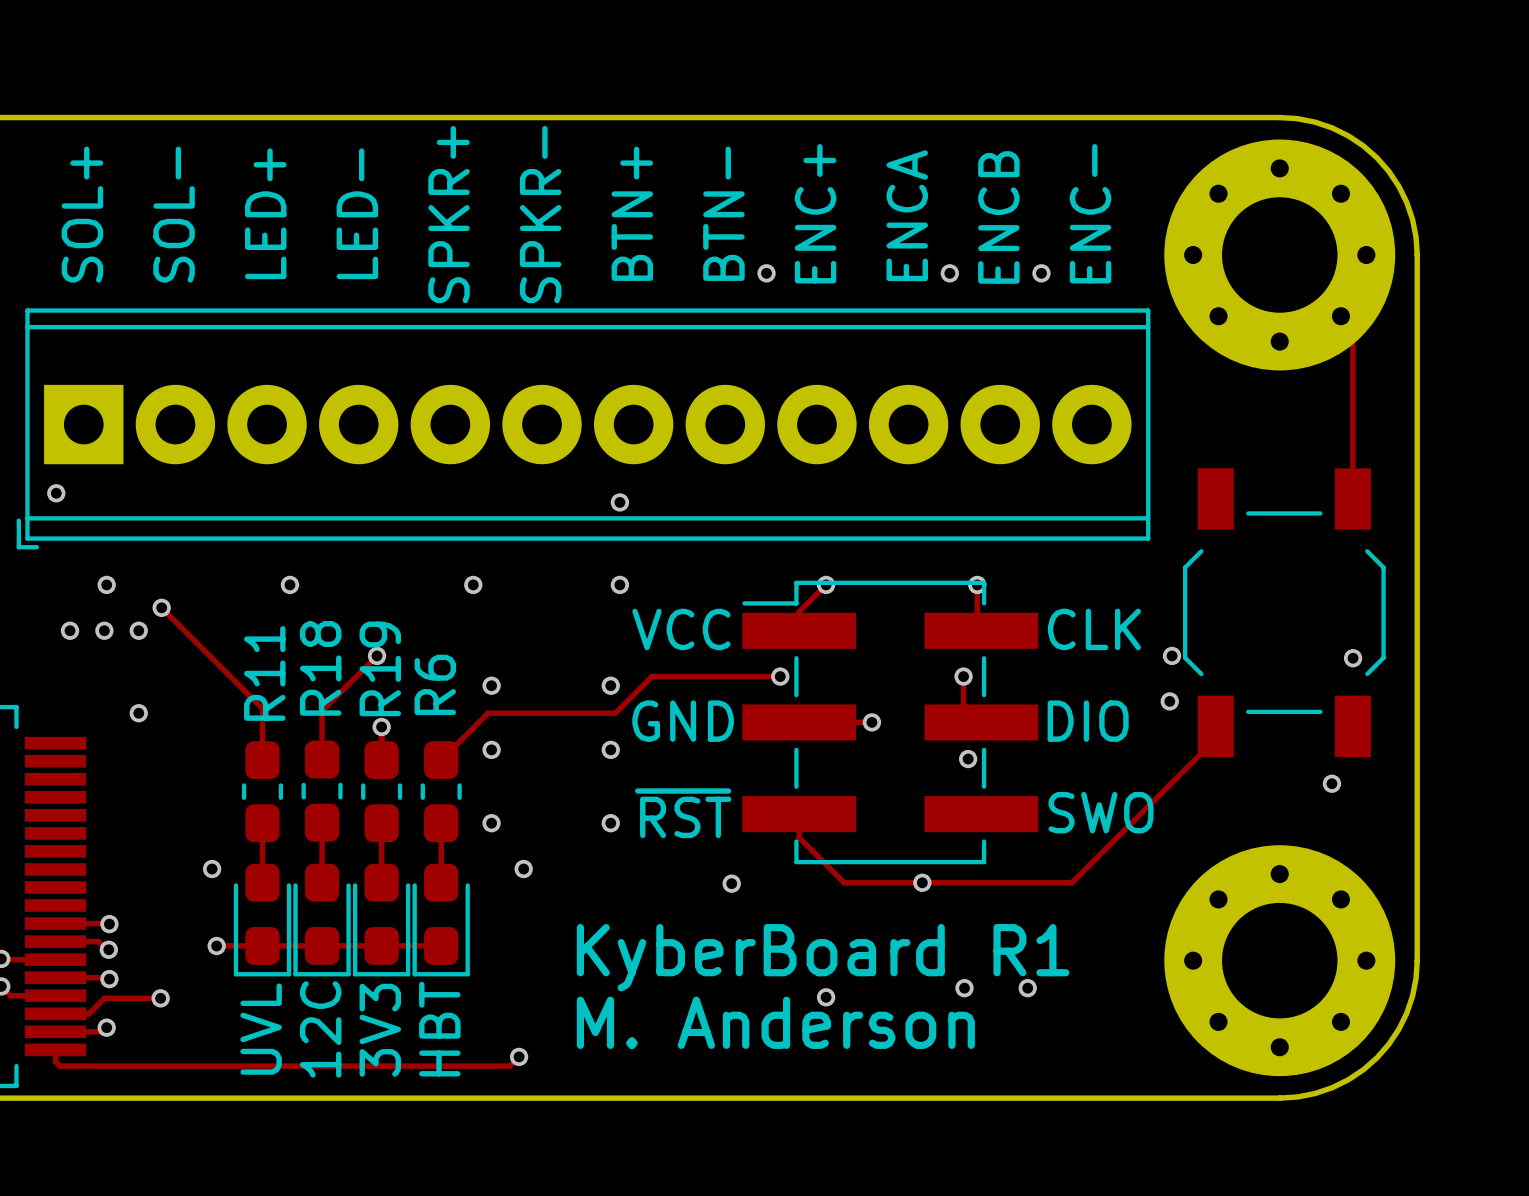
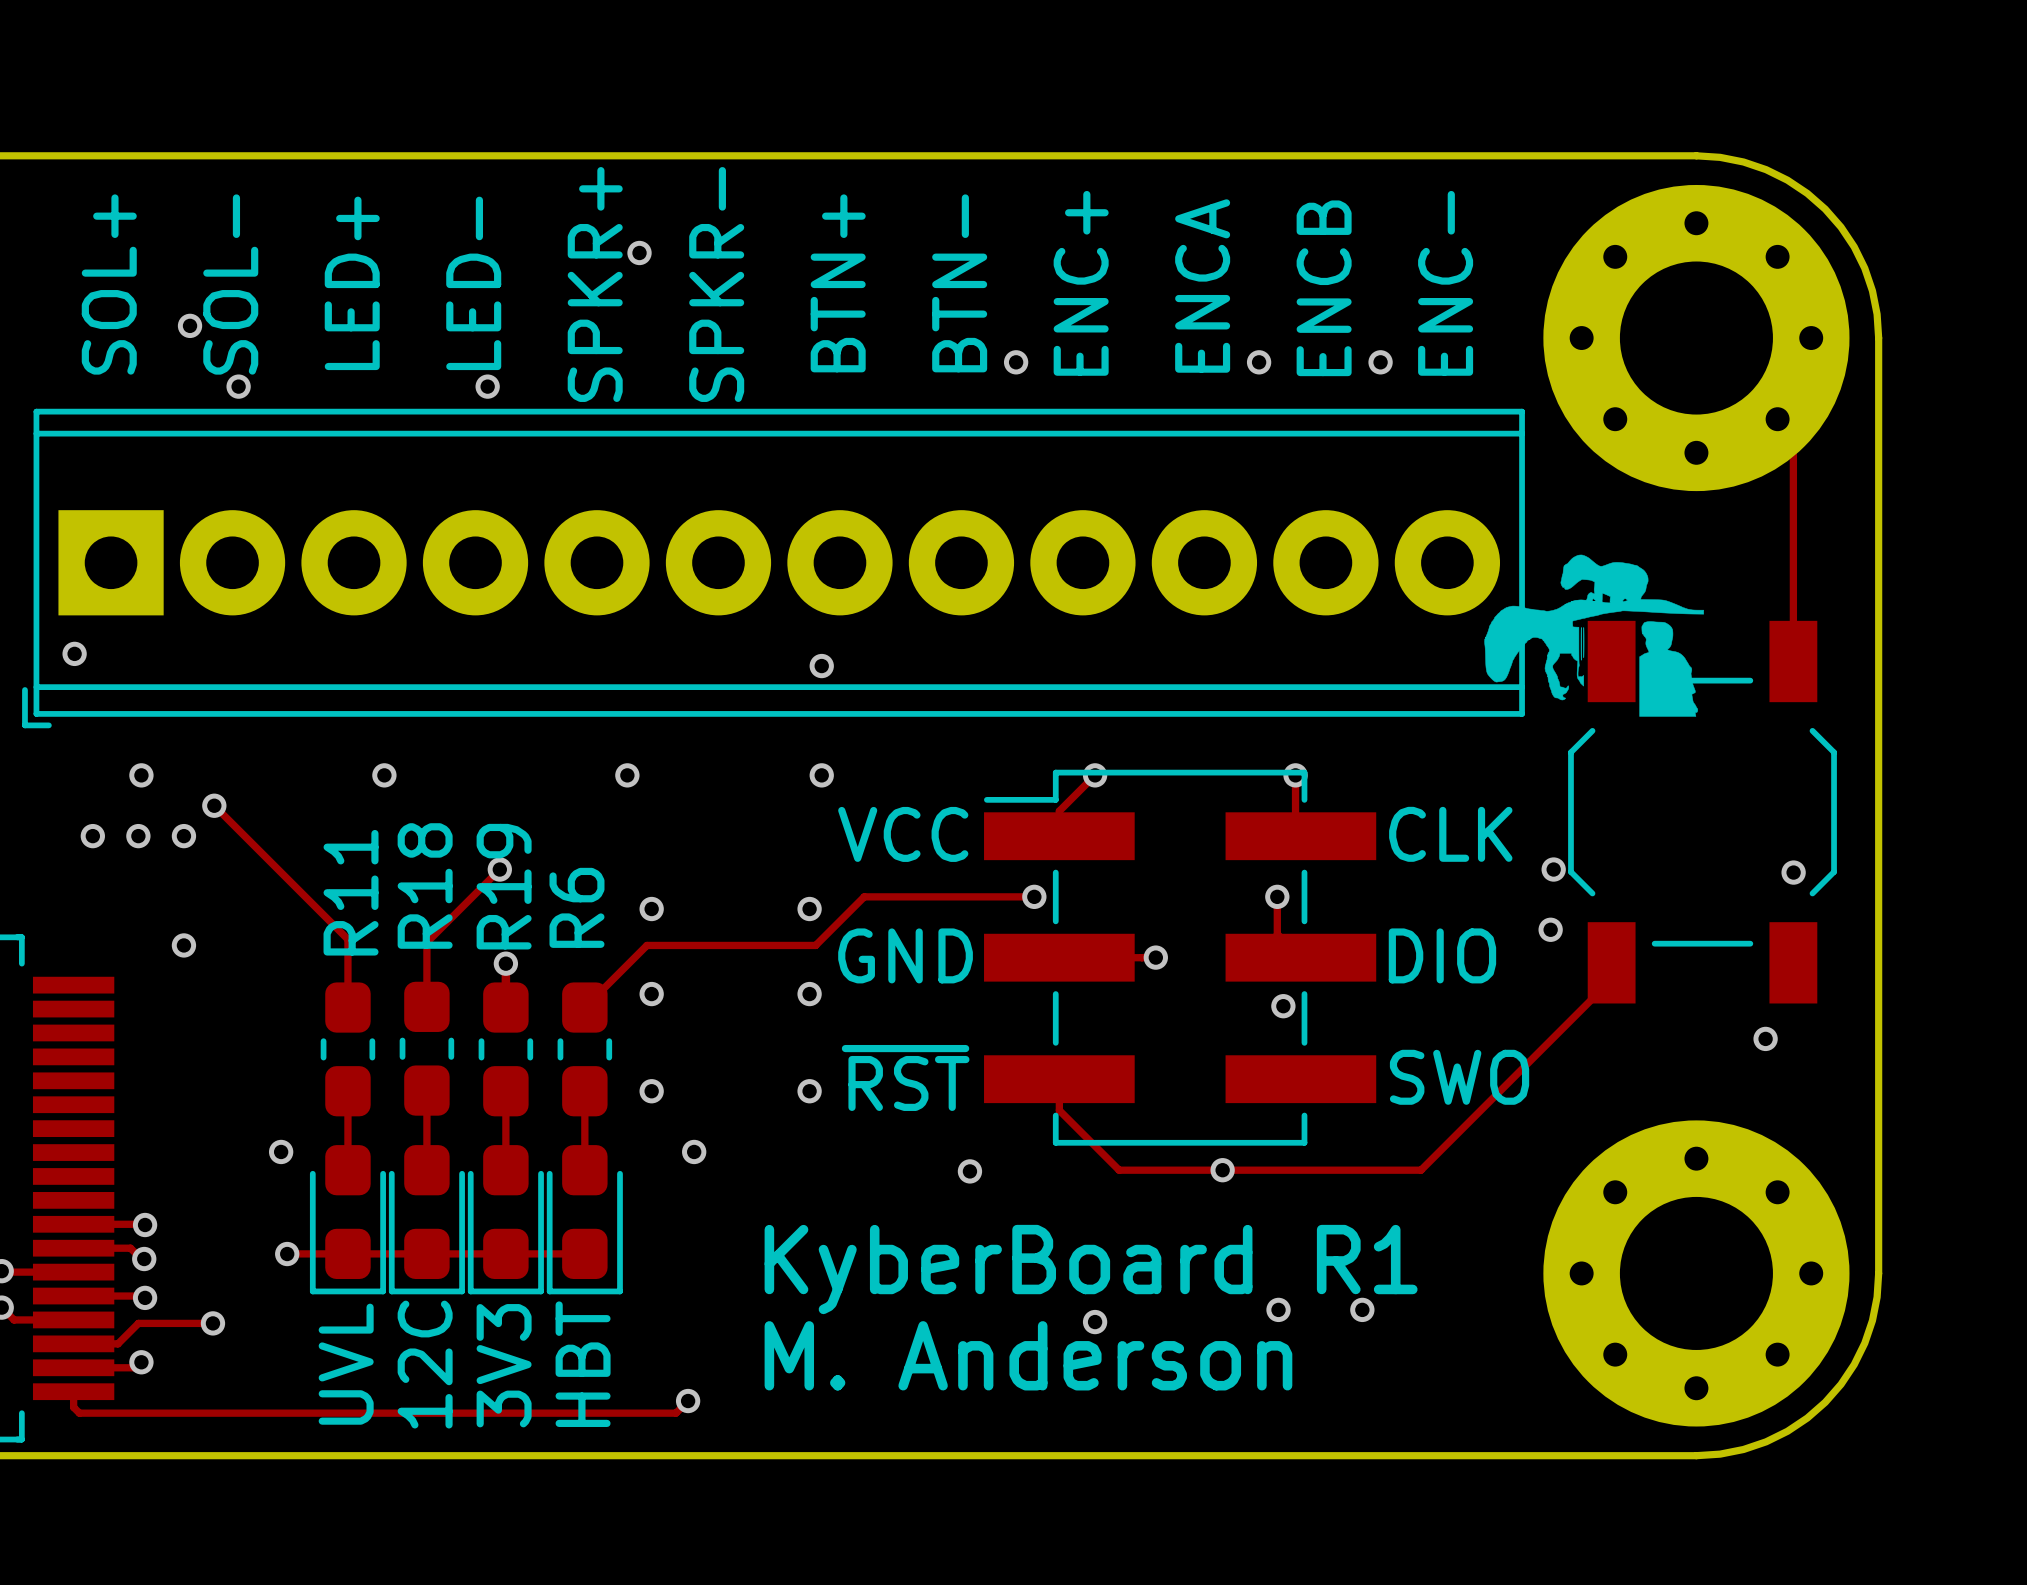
via: none -> (639, 252)
via: none -> (190, 325)
via: none -> (238, 386)
via: none -> (487, 386)
drawing: none -> [1484, 554, 1704, 717]

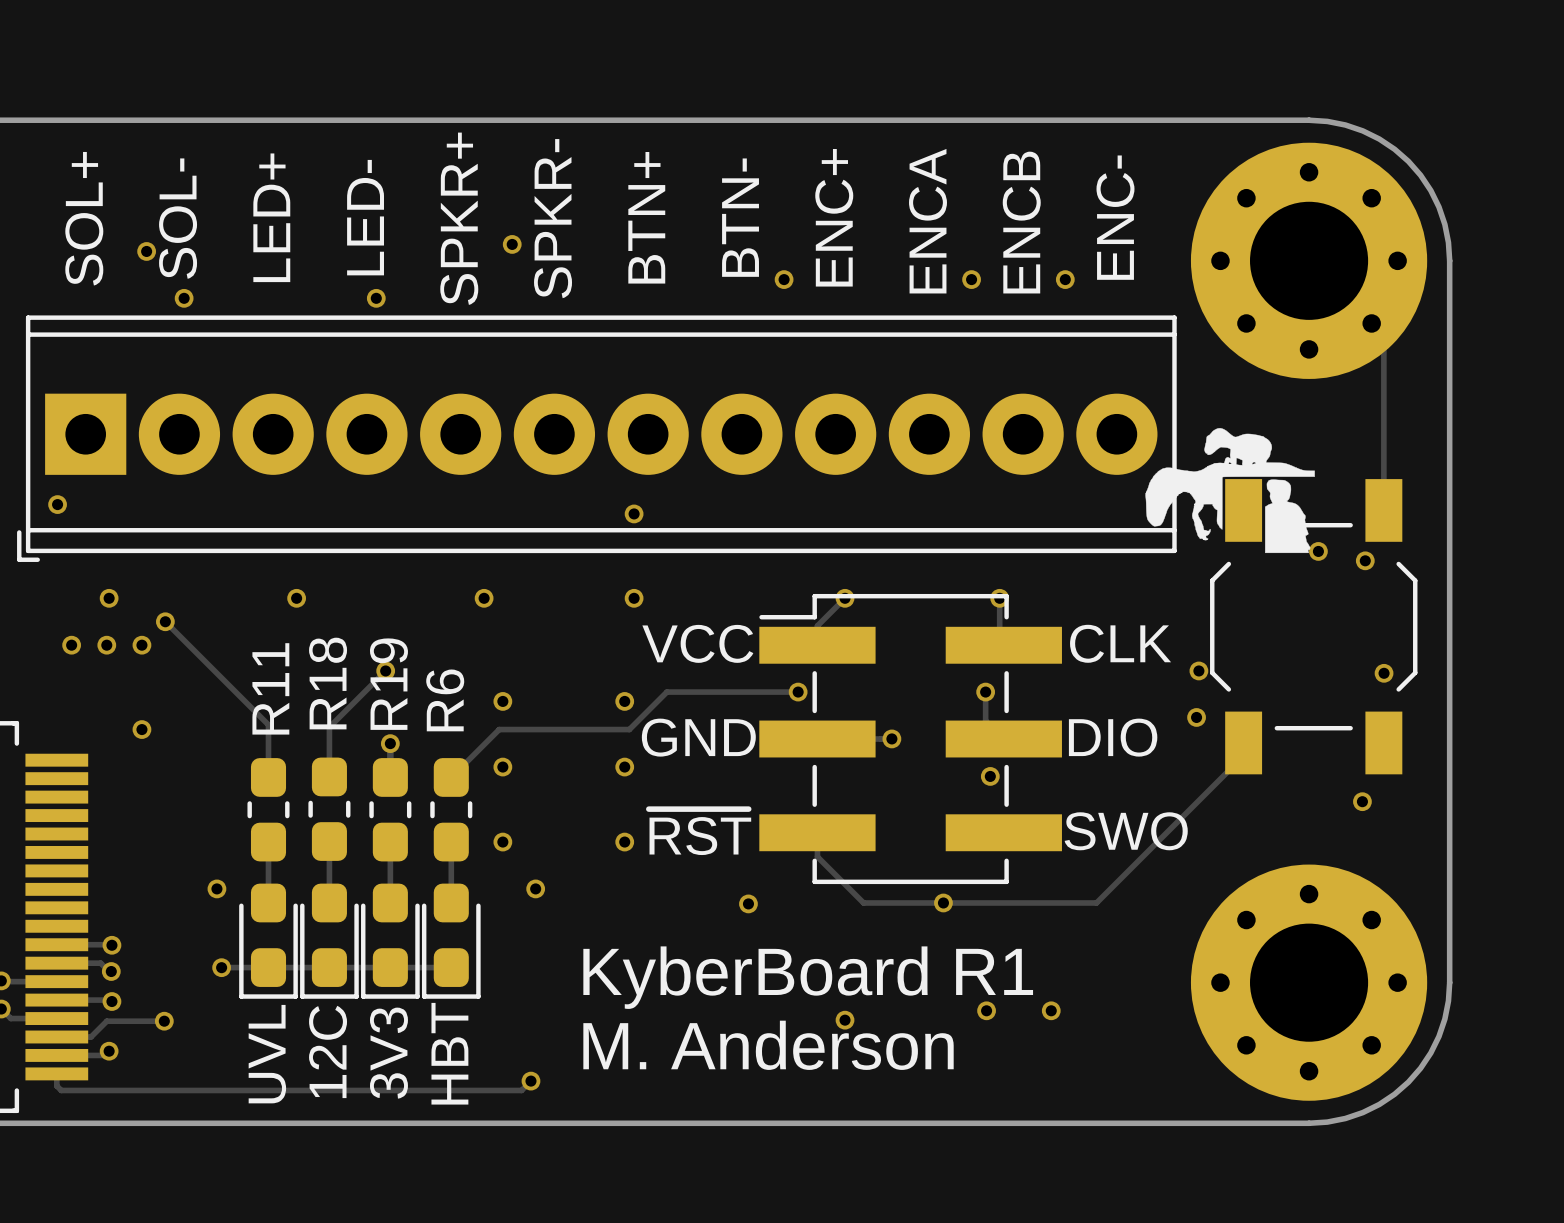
via position: (639, 252) -> (512, 244)
drawing shape: [1484, 554, 1704, 717] -> [1145, 428, 1315, 554]
via: none -> (1318, 551)
via: none -> (1365, 560)

